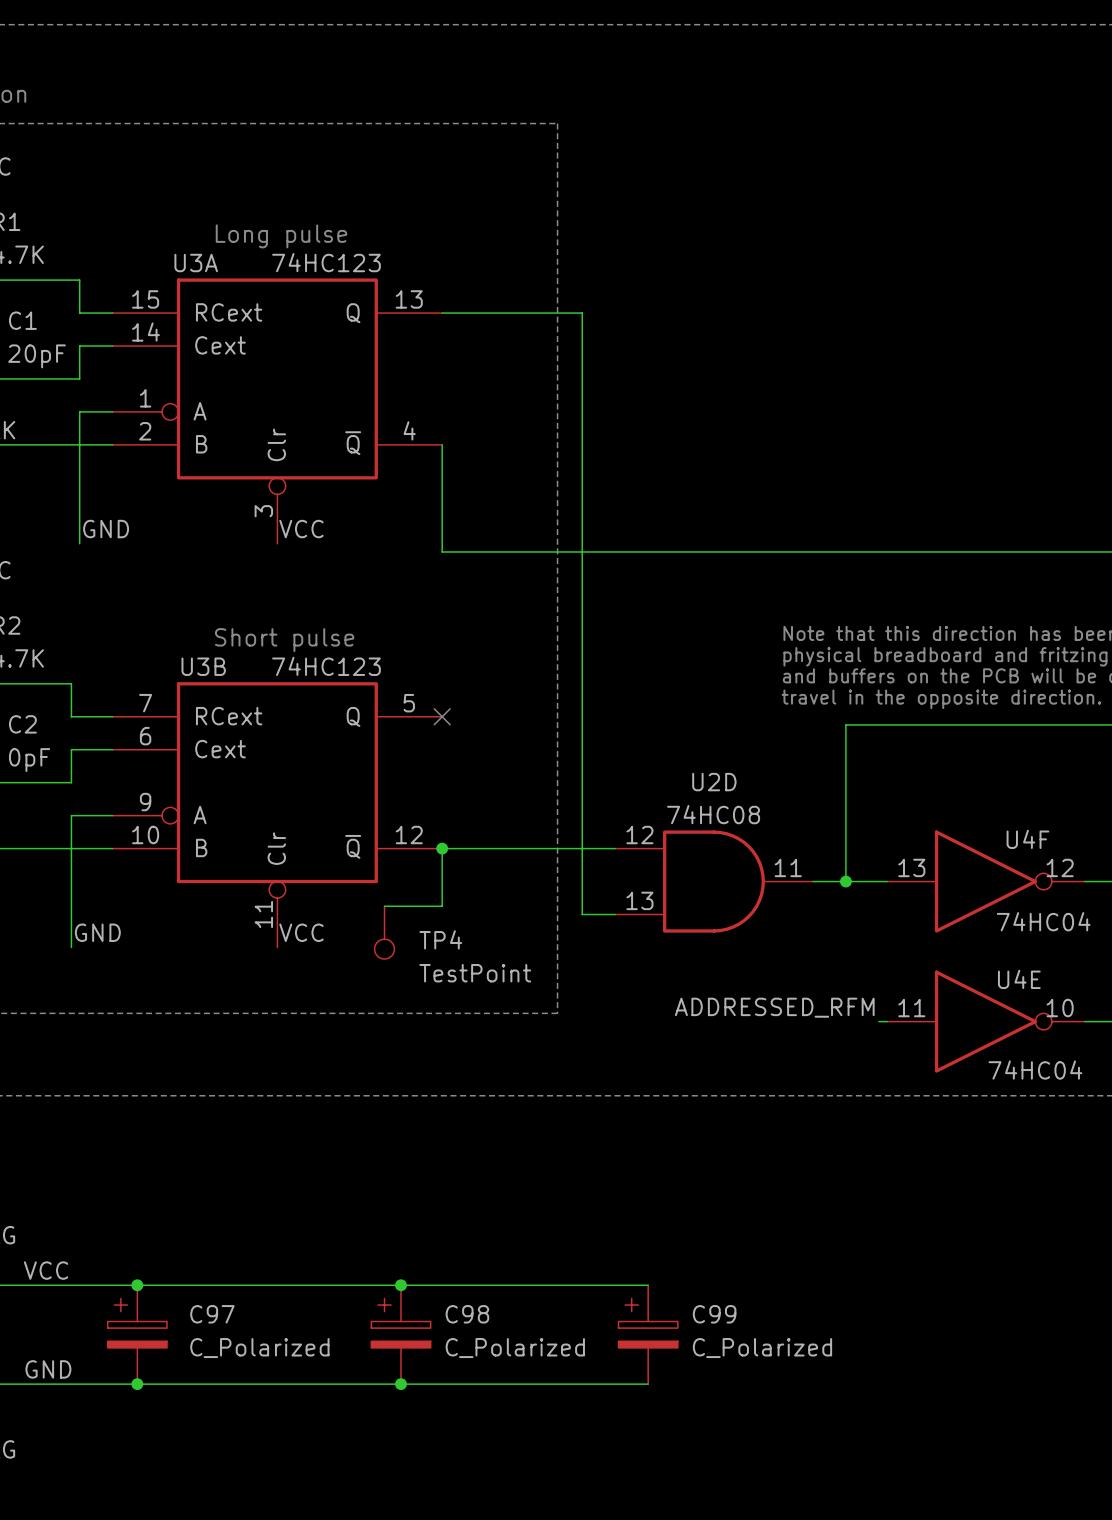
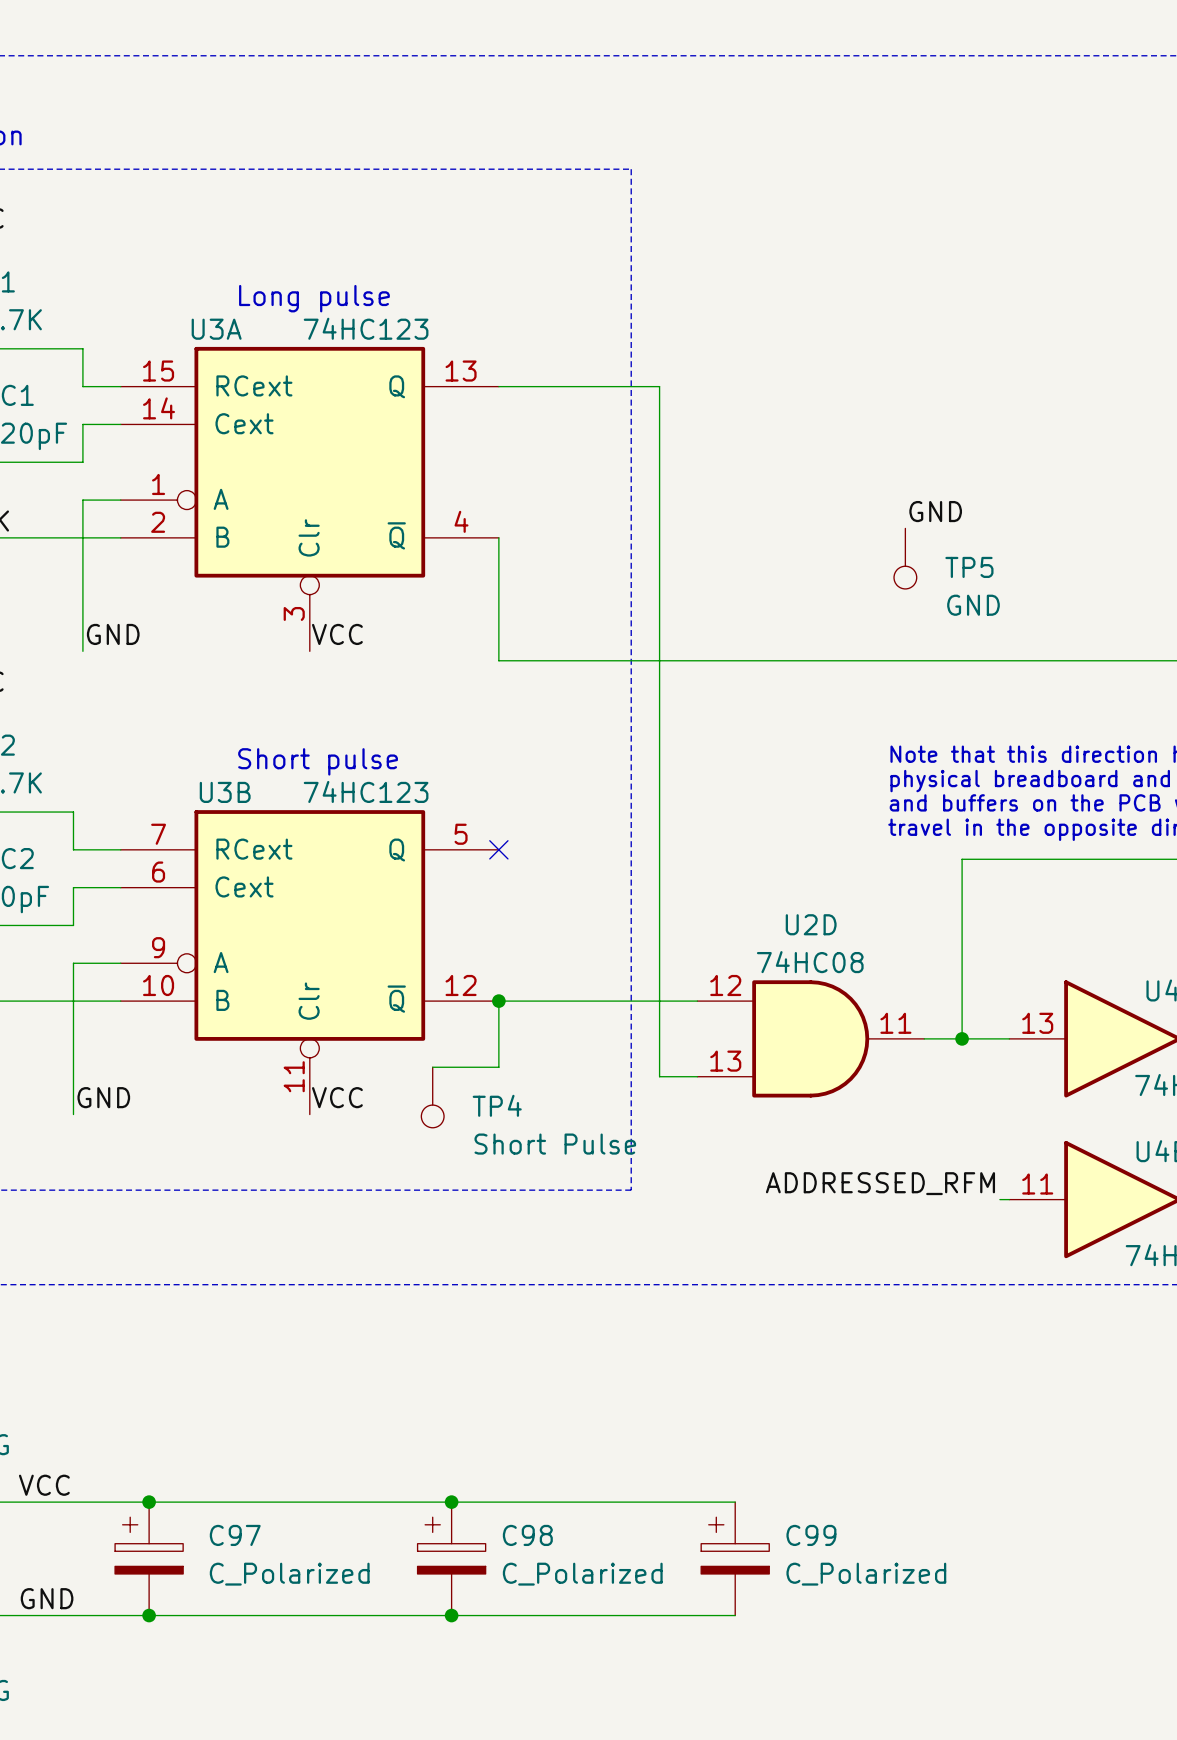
label: none -> GND (935, 511)
TP5: none -> GND (905, 558)
TP4 value: TestPoint (475, 973) -> Short Pulse (555, 1144)

